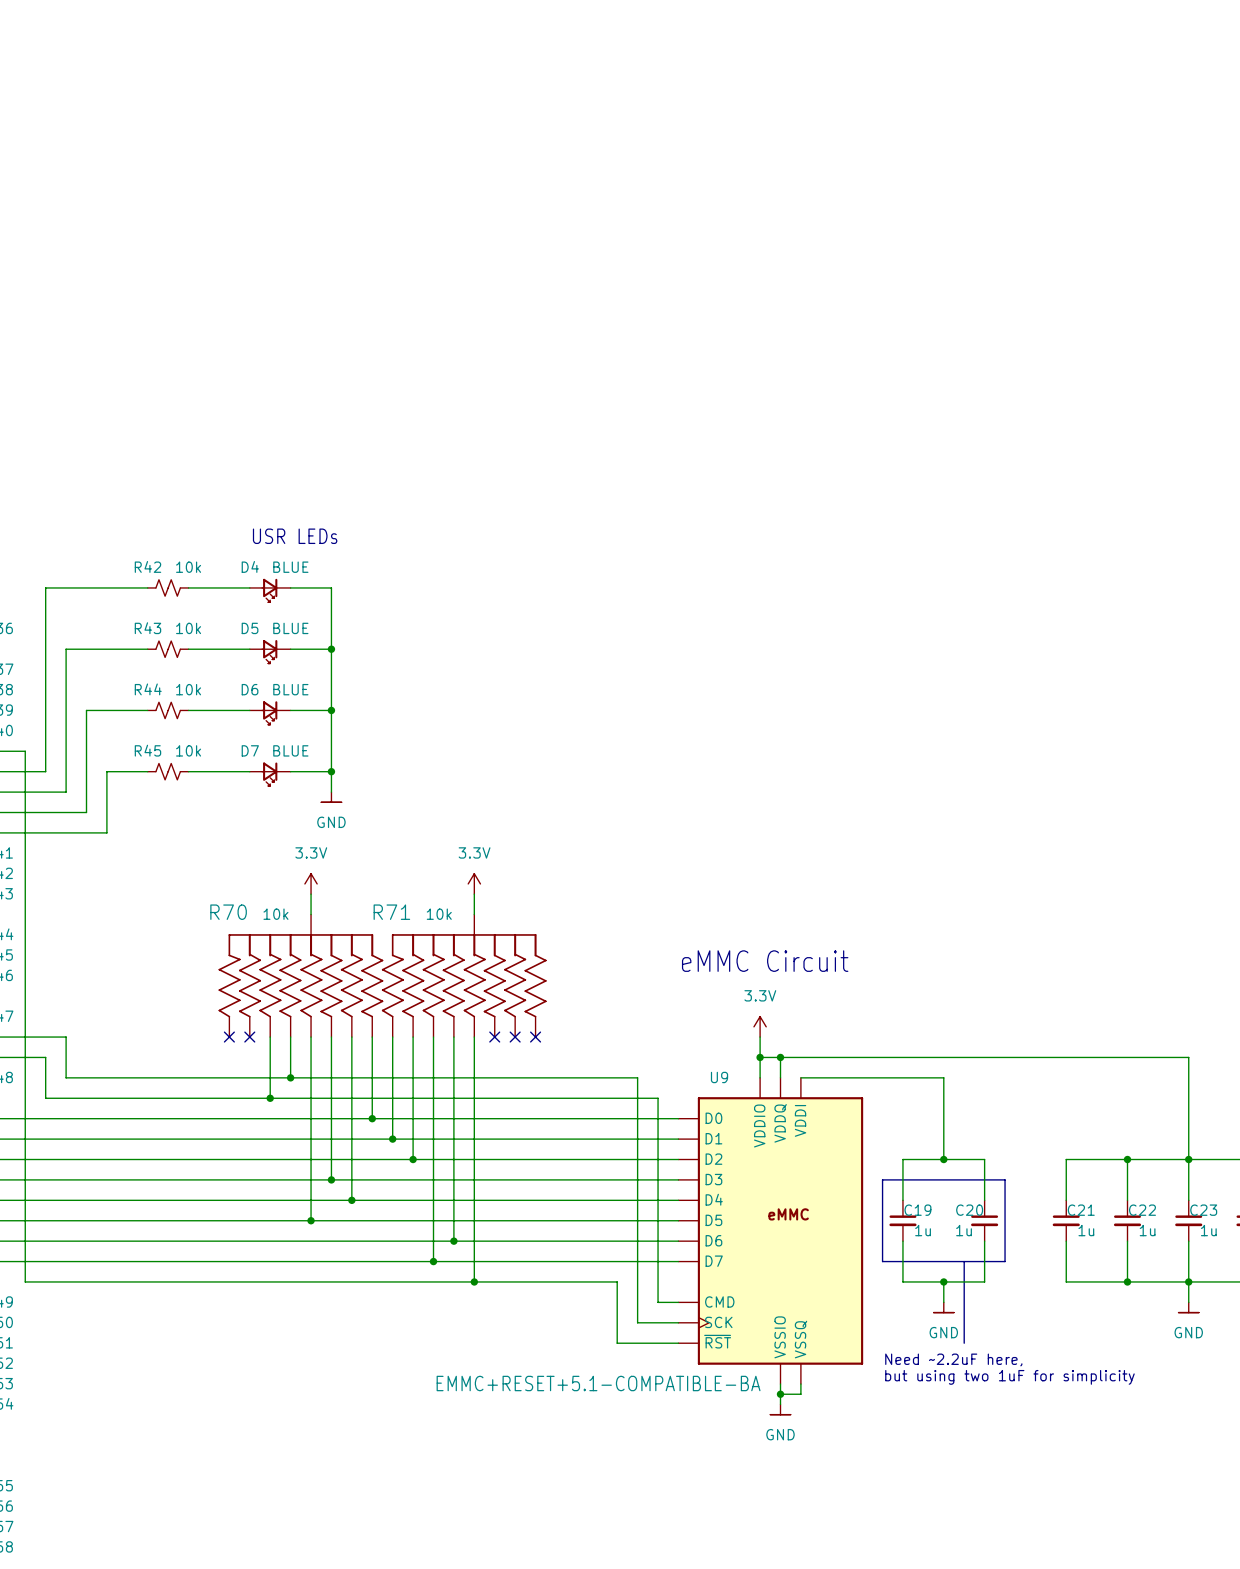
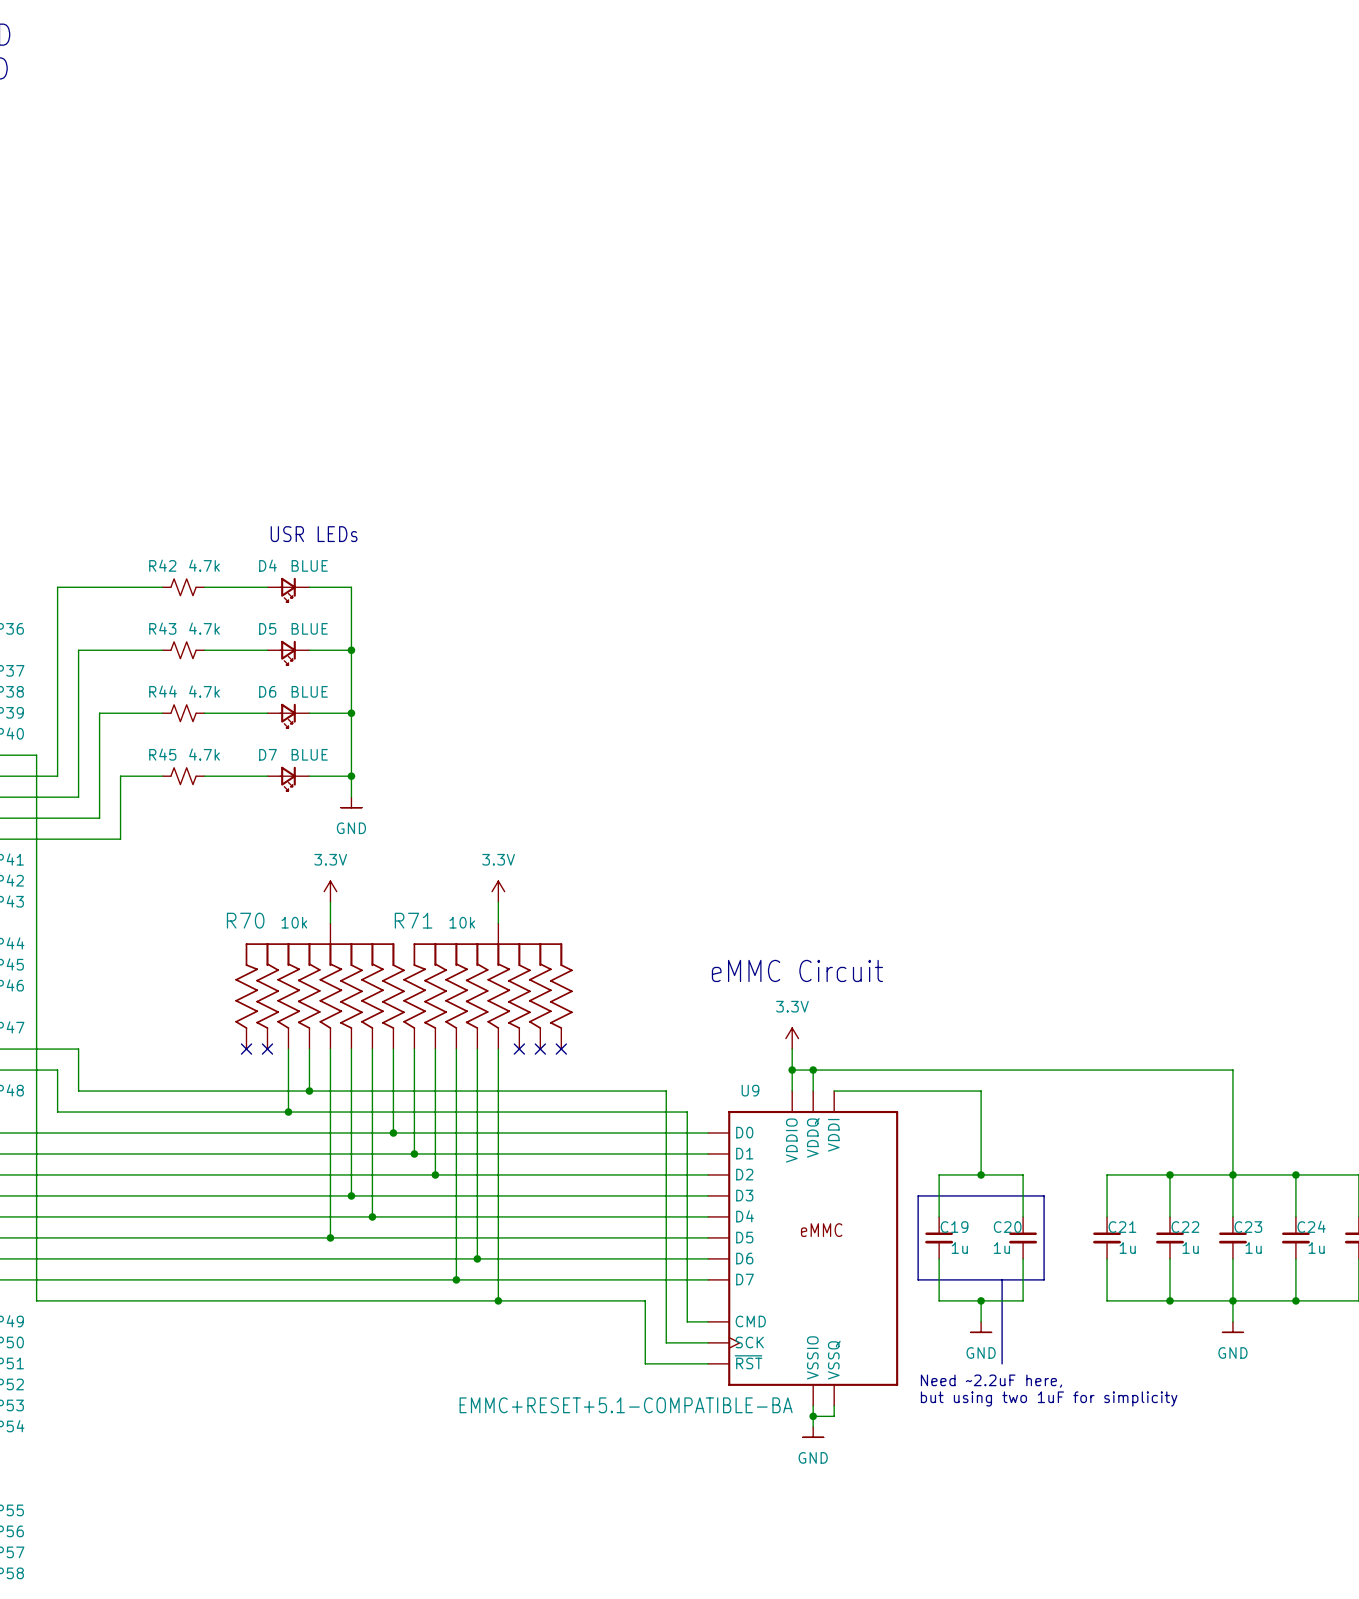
R42 value: 10k (188, 567) -> 4.7k (204, 565)
R43 value: 10k (188, 628) -> 4.7k (204, 628)
R44 value: 10k (188, 689) -> 4.7k (204, 691)
R45 value: 10k (188, 750) -> 4.7k (204, 754)
U9 symbol: [678, 1077, 864, 1385] -> [708, 1091, 899, 1406]

